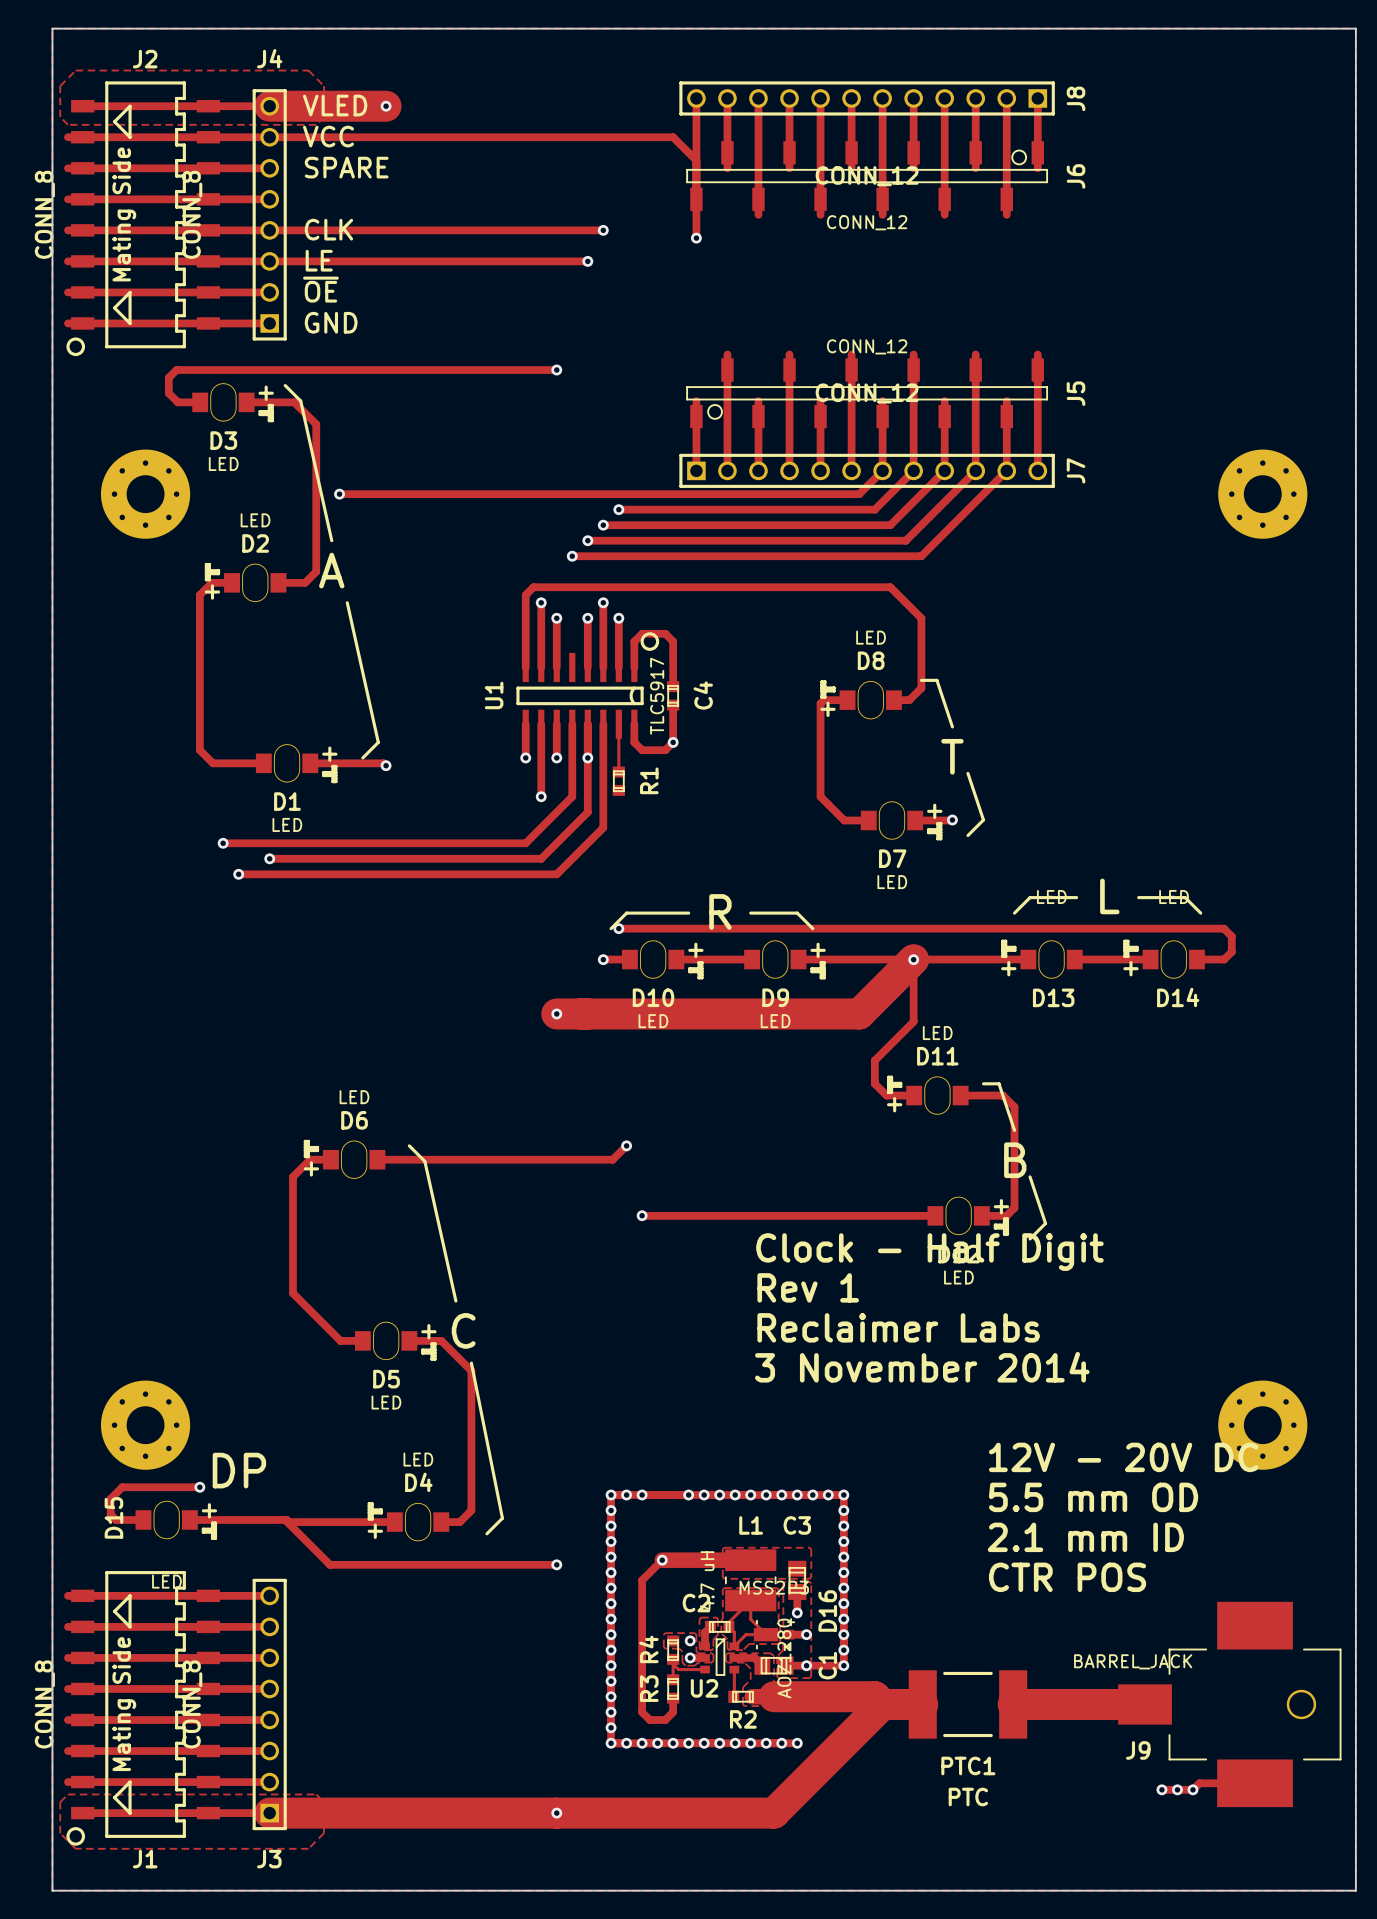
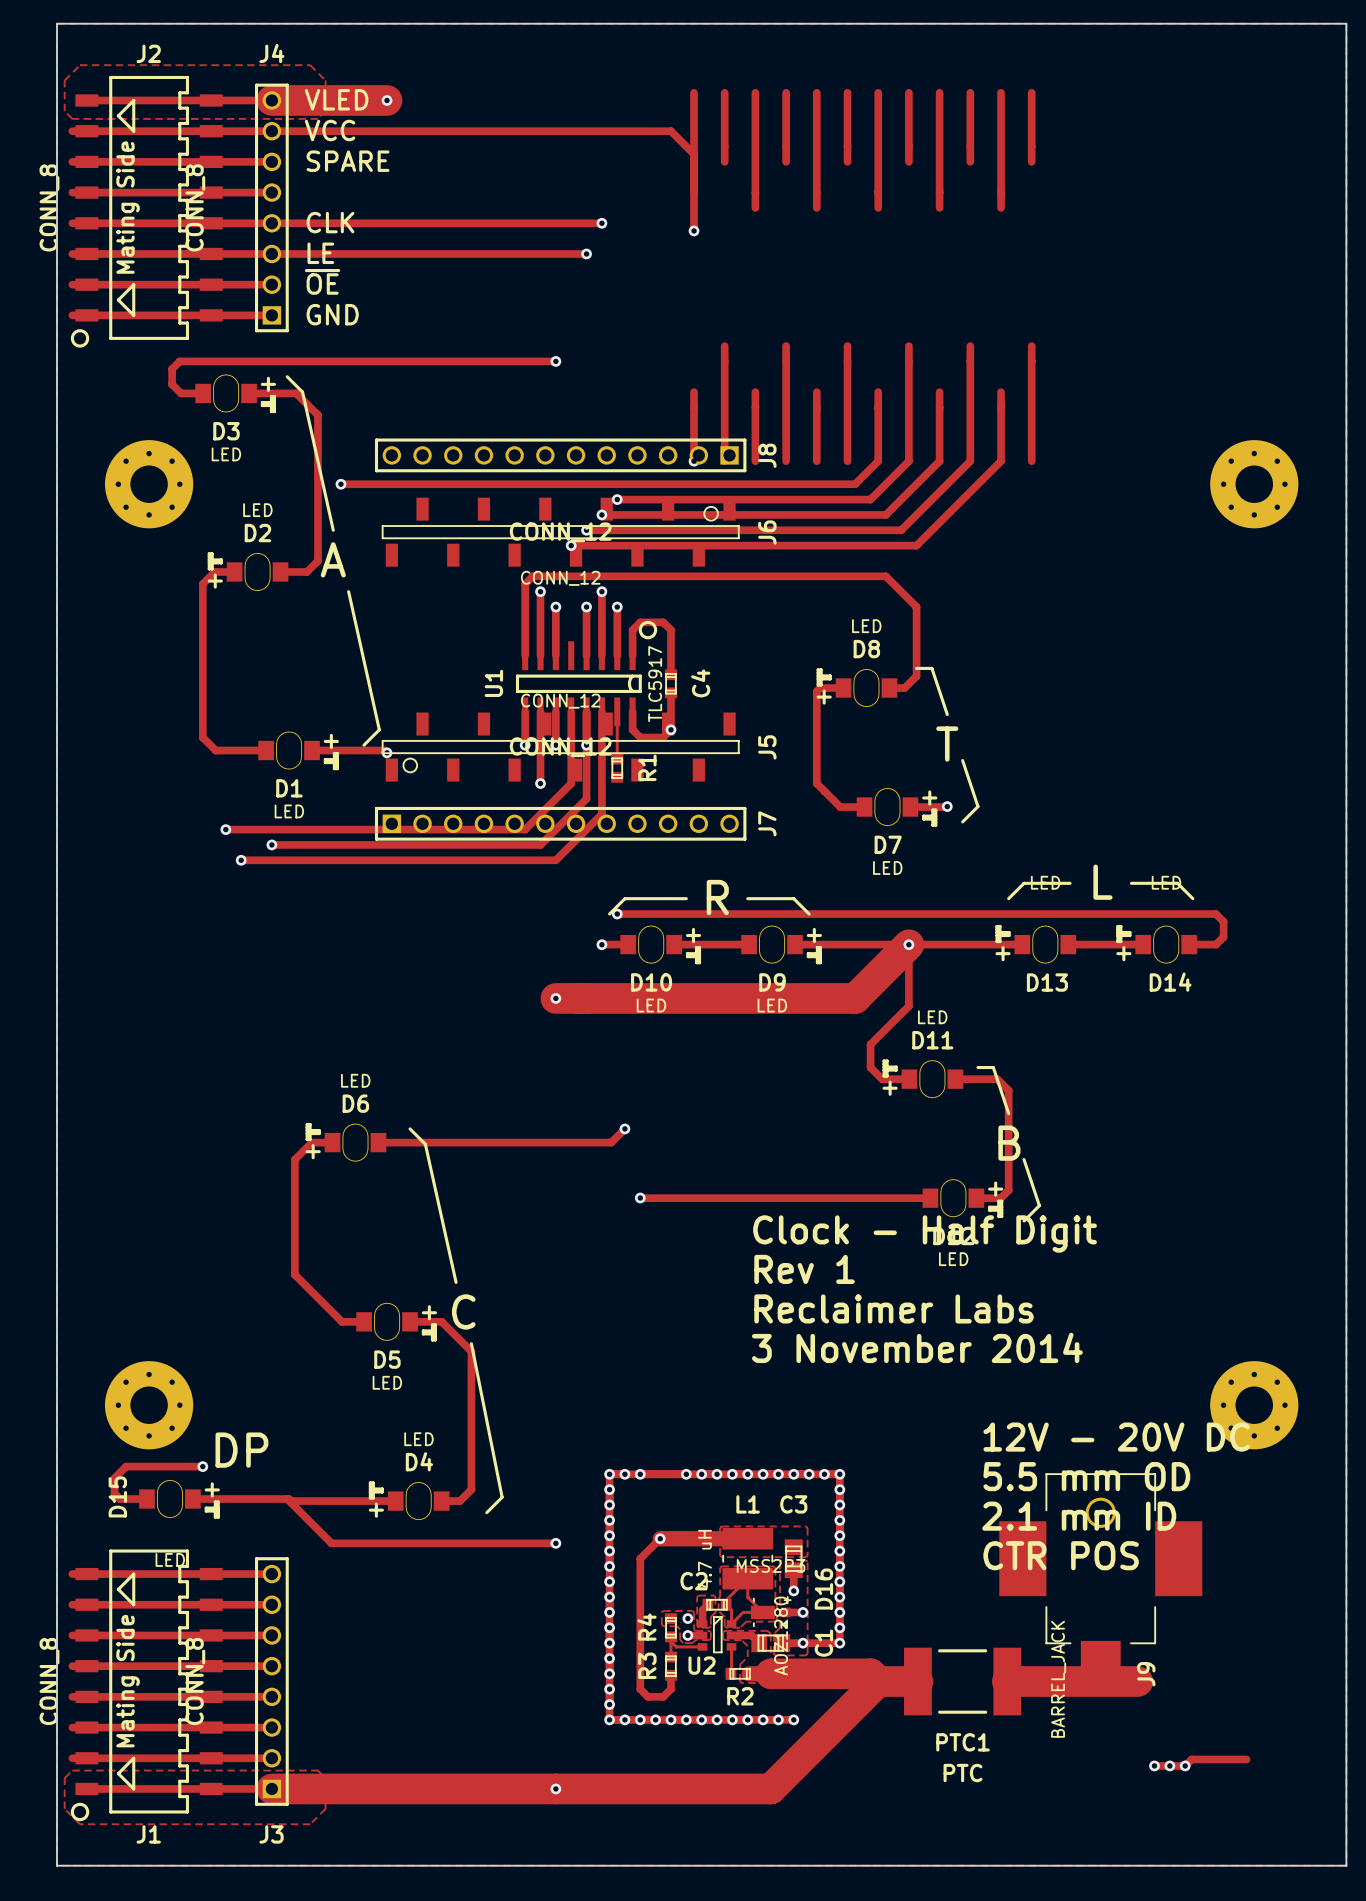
J8 position: (867, 98) -> (560, 455)
J6 position: (867, 176) -> (560, 532)
J5 position: (867, 393) -> (560, 747)
J7 position: (867, 470) -> (560, 823)
J9 footprint: [1118, 1601, 1342, 1808] -> [999, 1473, 1203, 1695]
J9 value position: BARREL_JACK (1133, 1661) -> BARREL_JACK (1058, 1679)
J9 name position: J9 (1138, 1750) -> J9 (1146, 1674)

